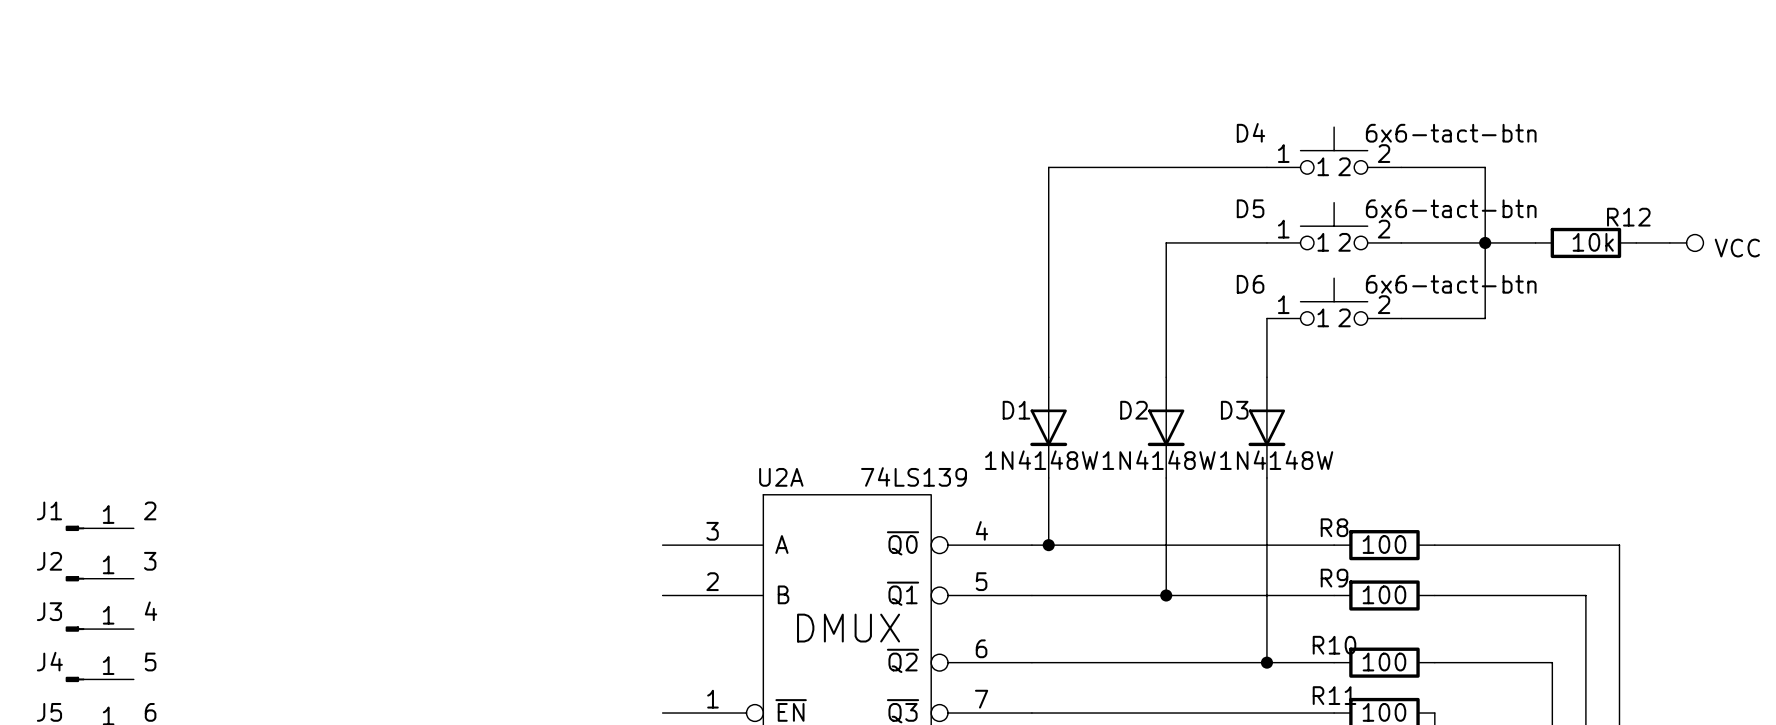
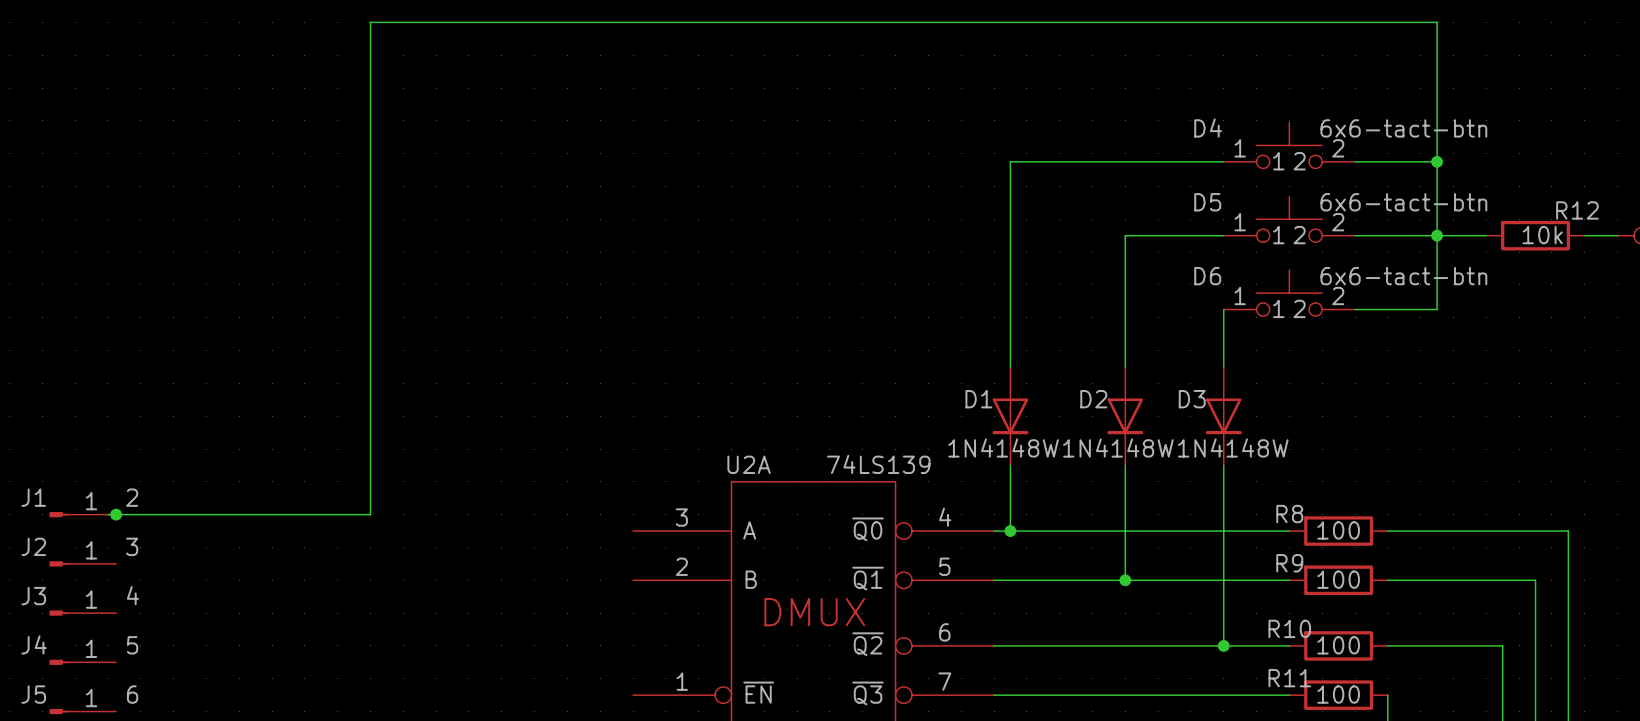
wire: none -> (1437, 161) (1437, 22) (370, 22) (370, 514) (107, 514)
junction: none -> (1437, 161)
junction: none -> (116, 514)

